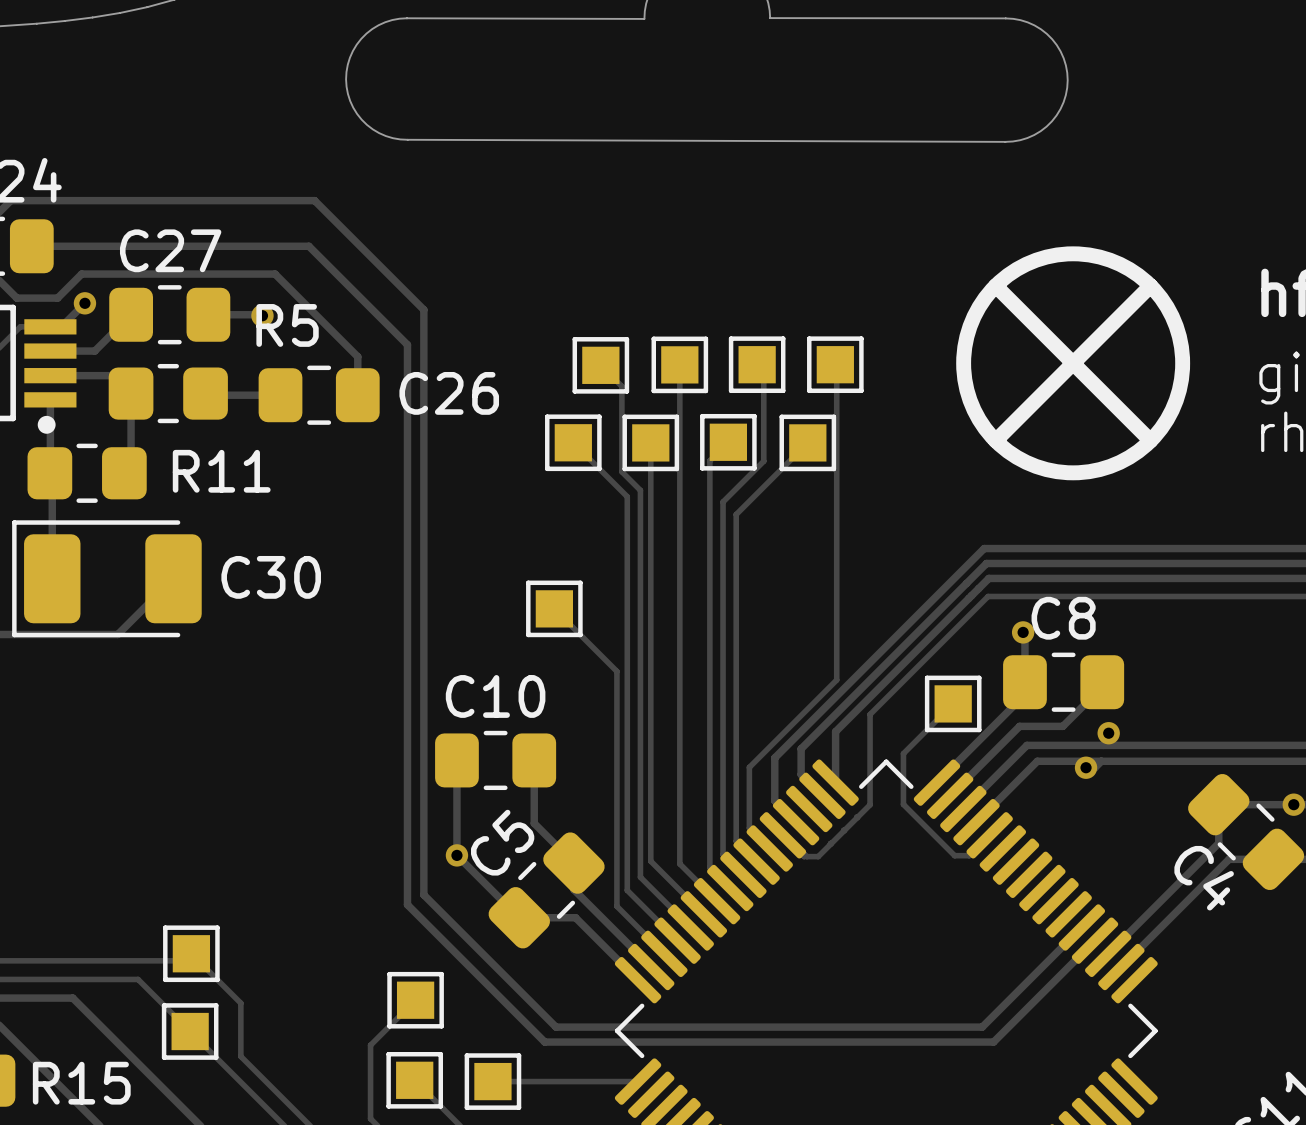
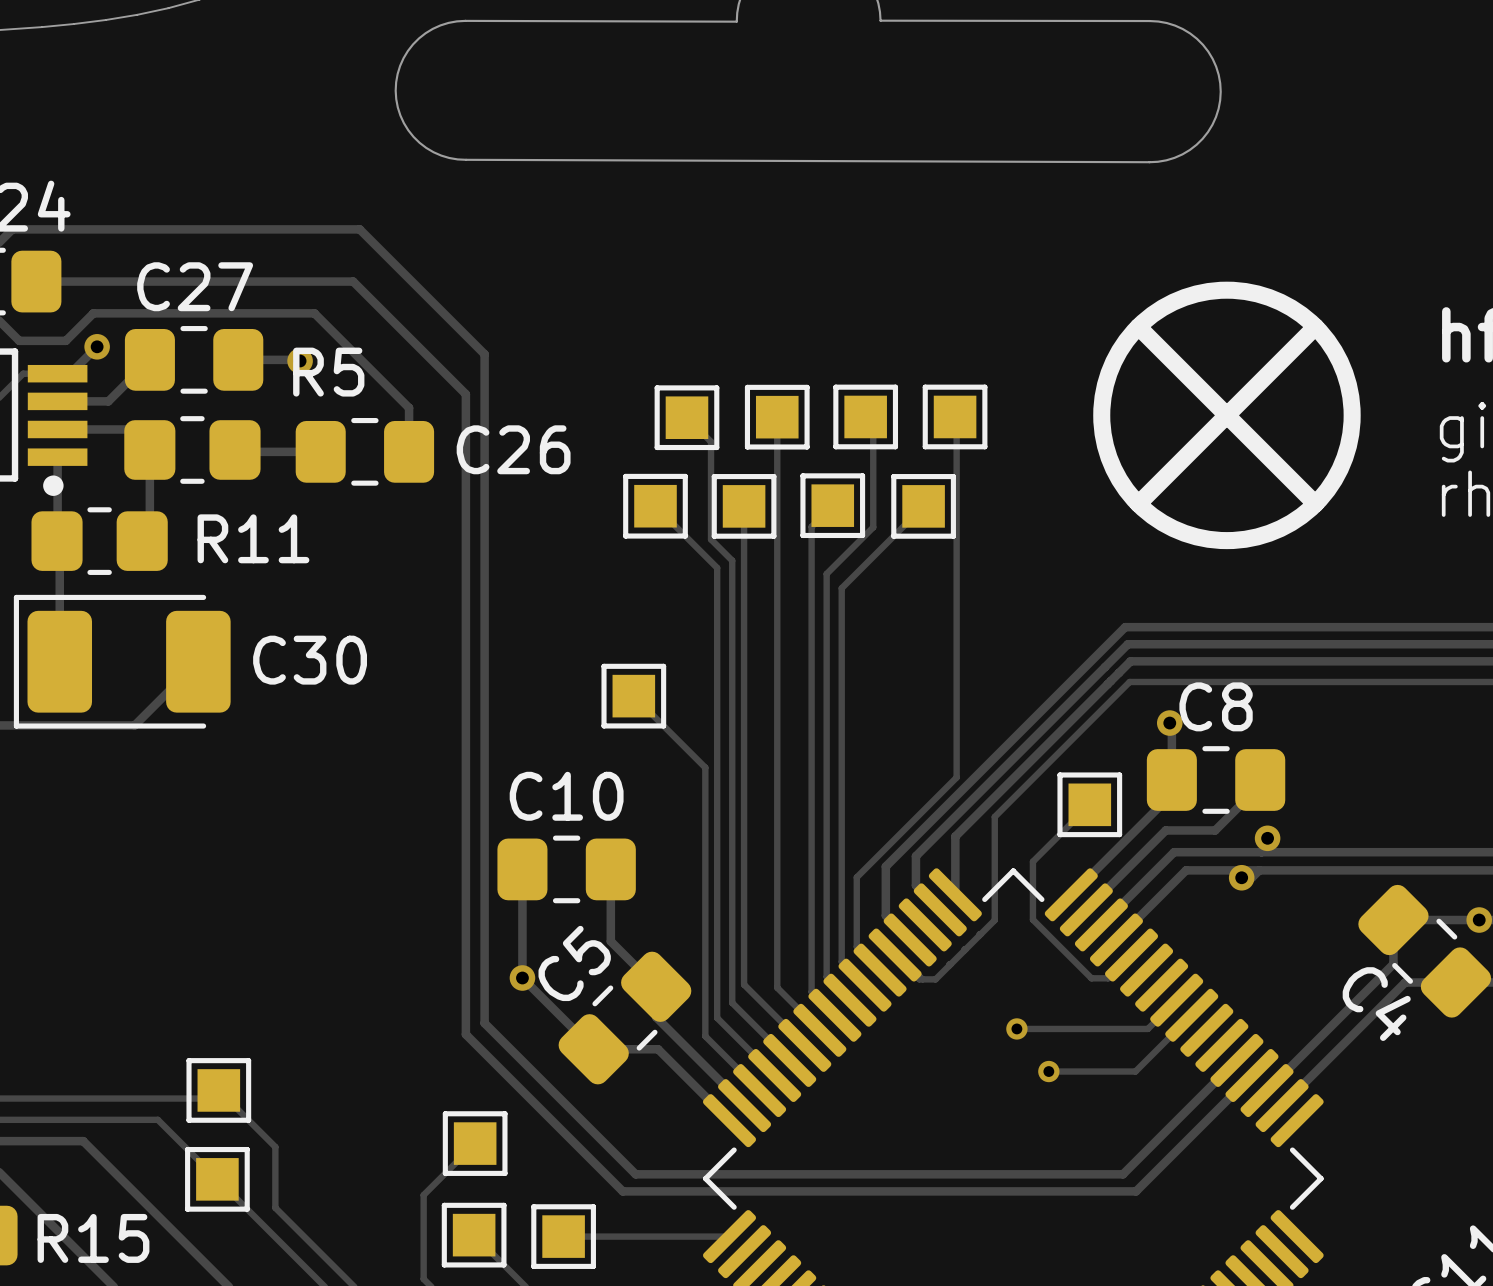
track: none -> (1176, 1000) (1147, 1028) (1016, 1028)
track: none -> (1191, 1015) (1135, 1071) (1048, 1071)
via: none -> (1016, 1028)
via: none -> (1048, 1071)

